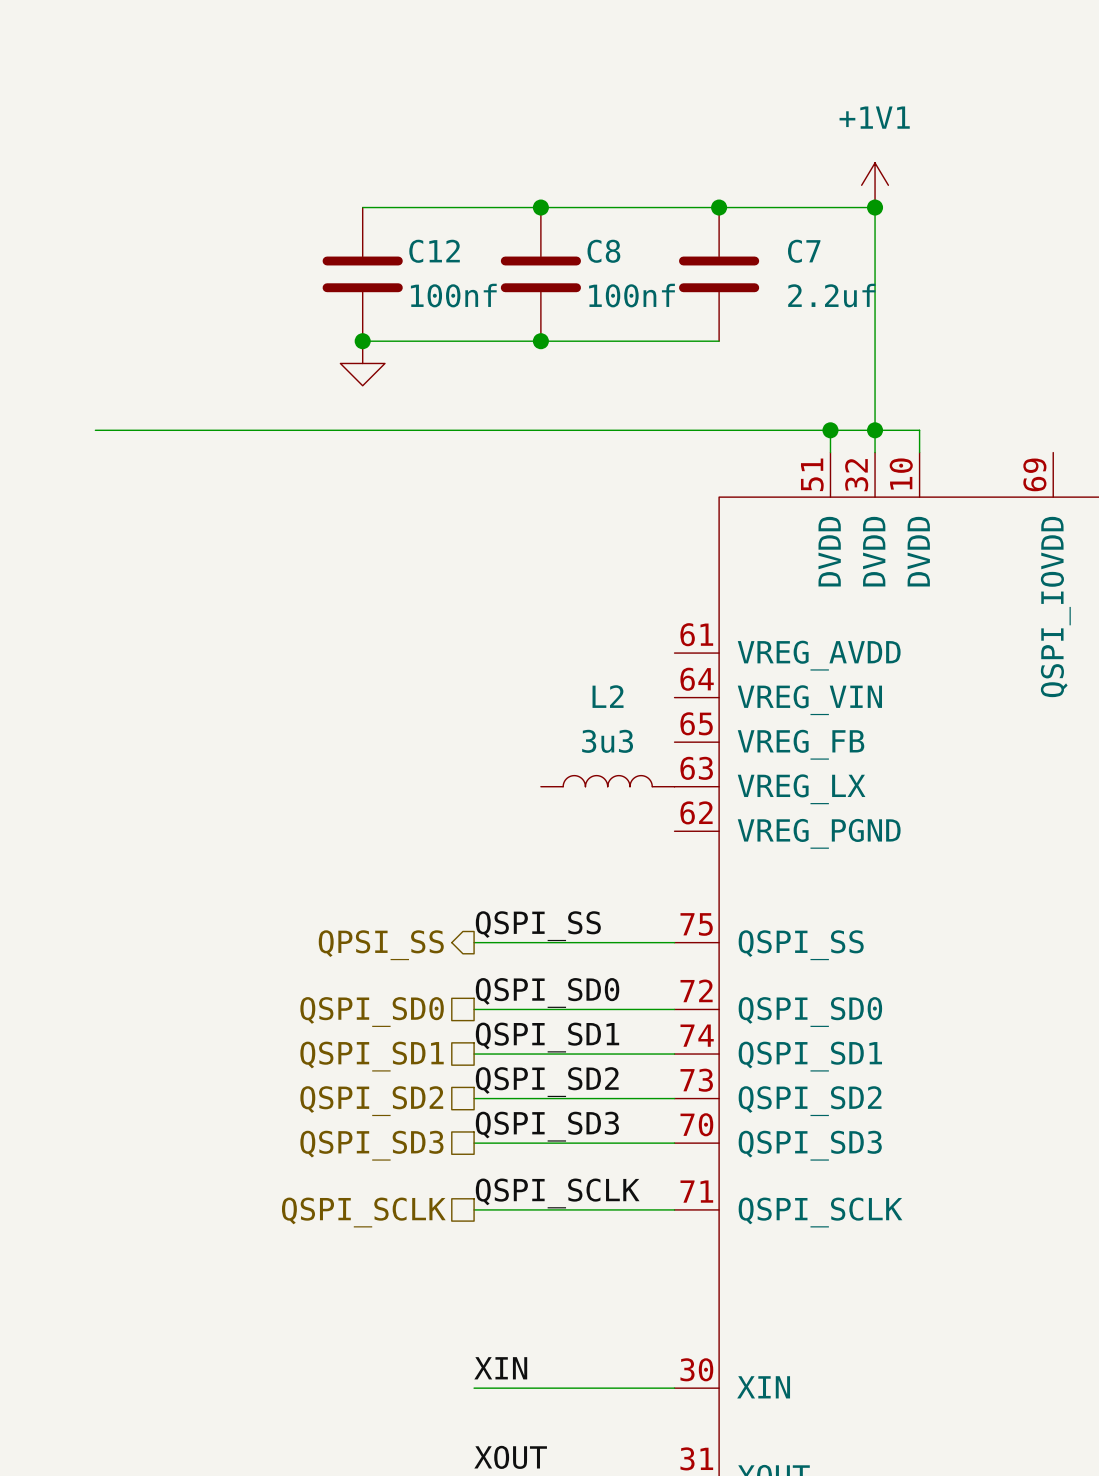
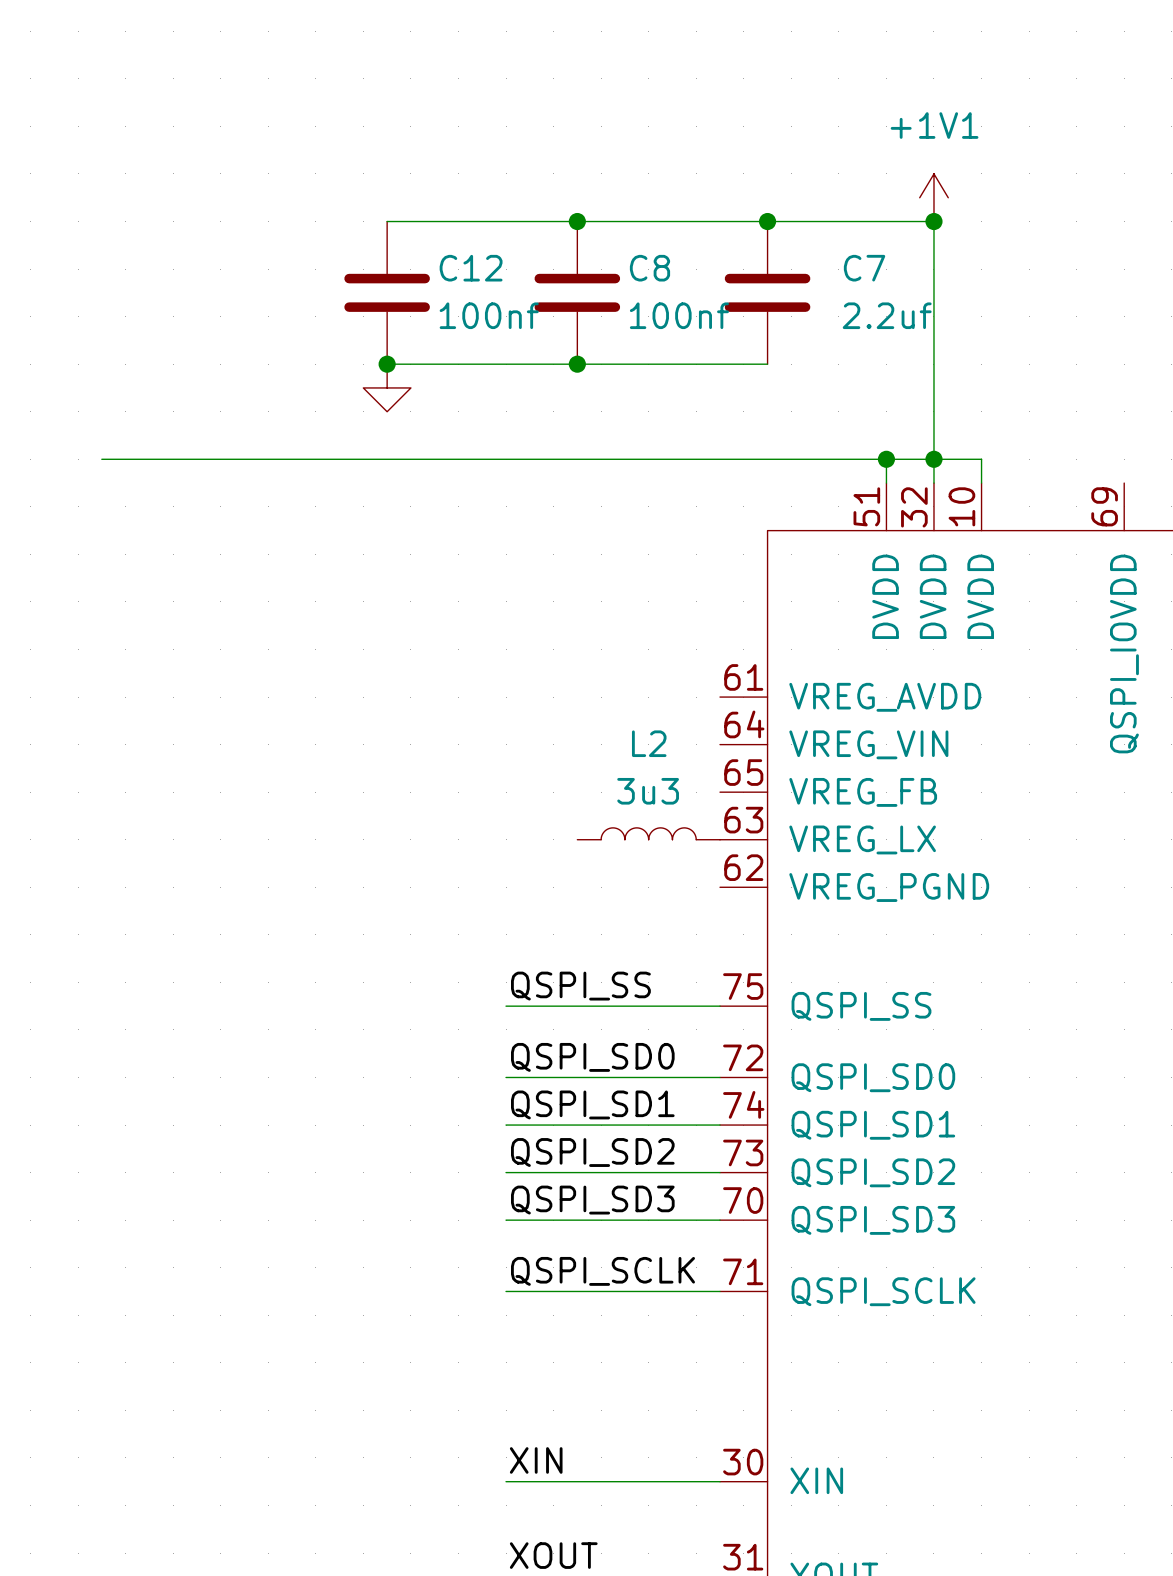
hierarchical label: QPSI_SS (381, 945) -> none
hierarchical label: QSPI_SD0 (372, 1012) -> none
hierarchical label: QSPI_SD1 (372, 1056) -> none
hierarchical label: QSPI_SD2 (371, 1101) -> none
hierarchical label: QSPI_SD3 (371, 1145) -> none
hierarchical label: QSPI_SCLK (363, 1212) -> none

